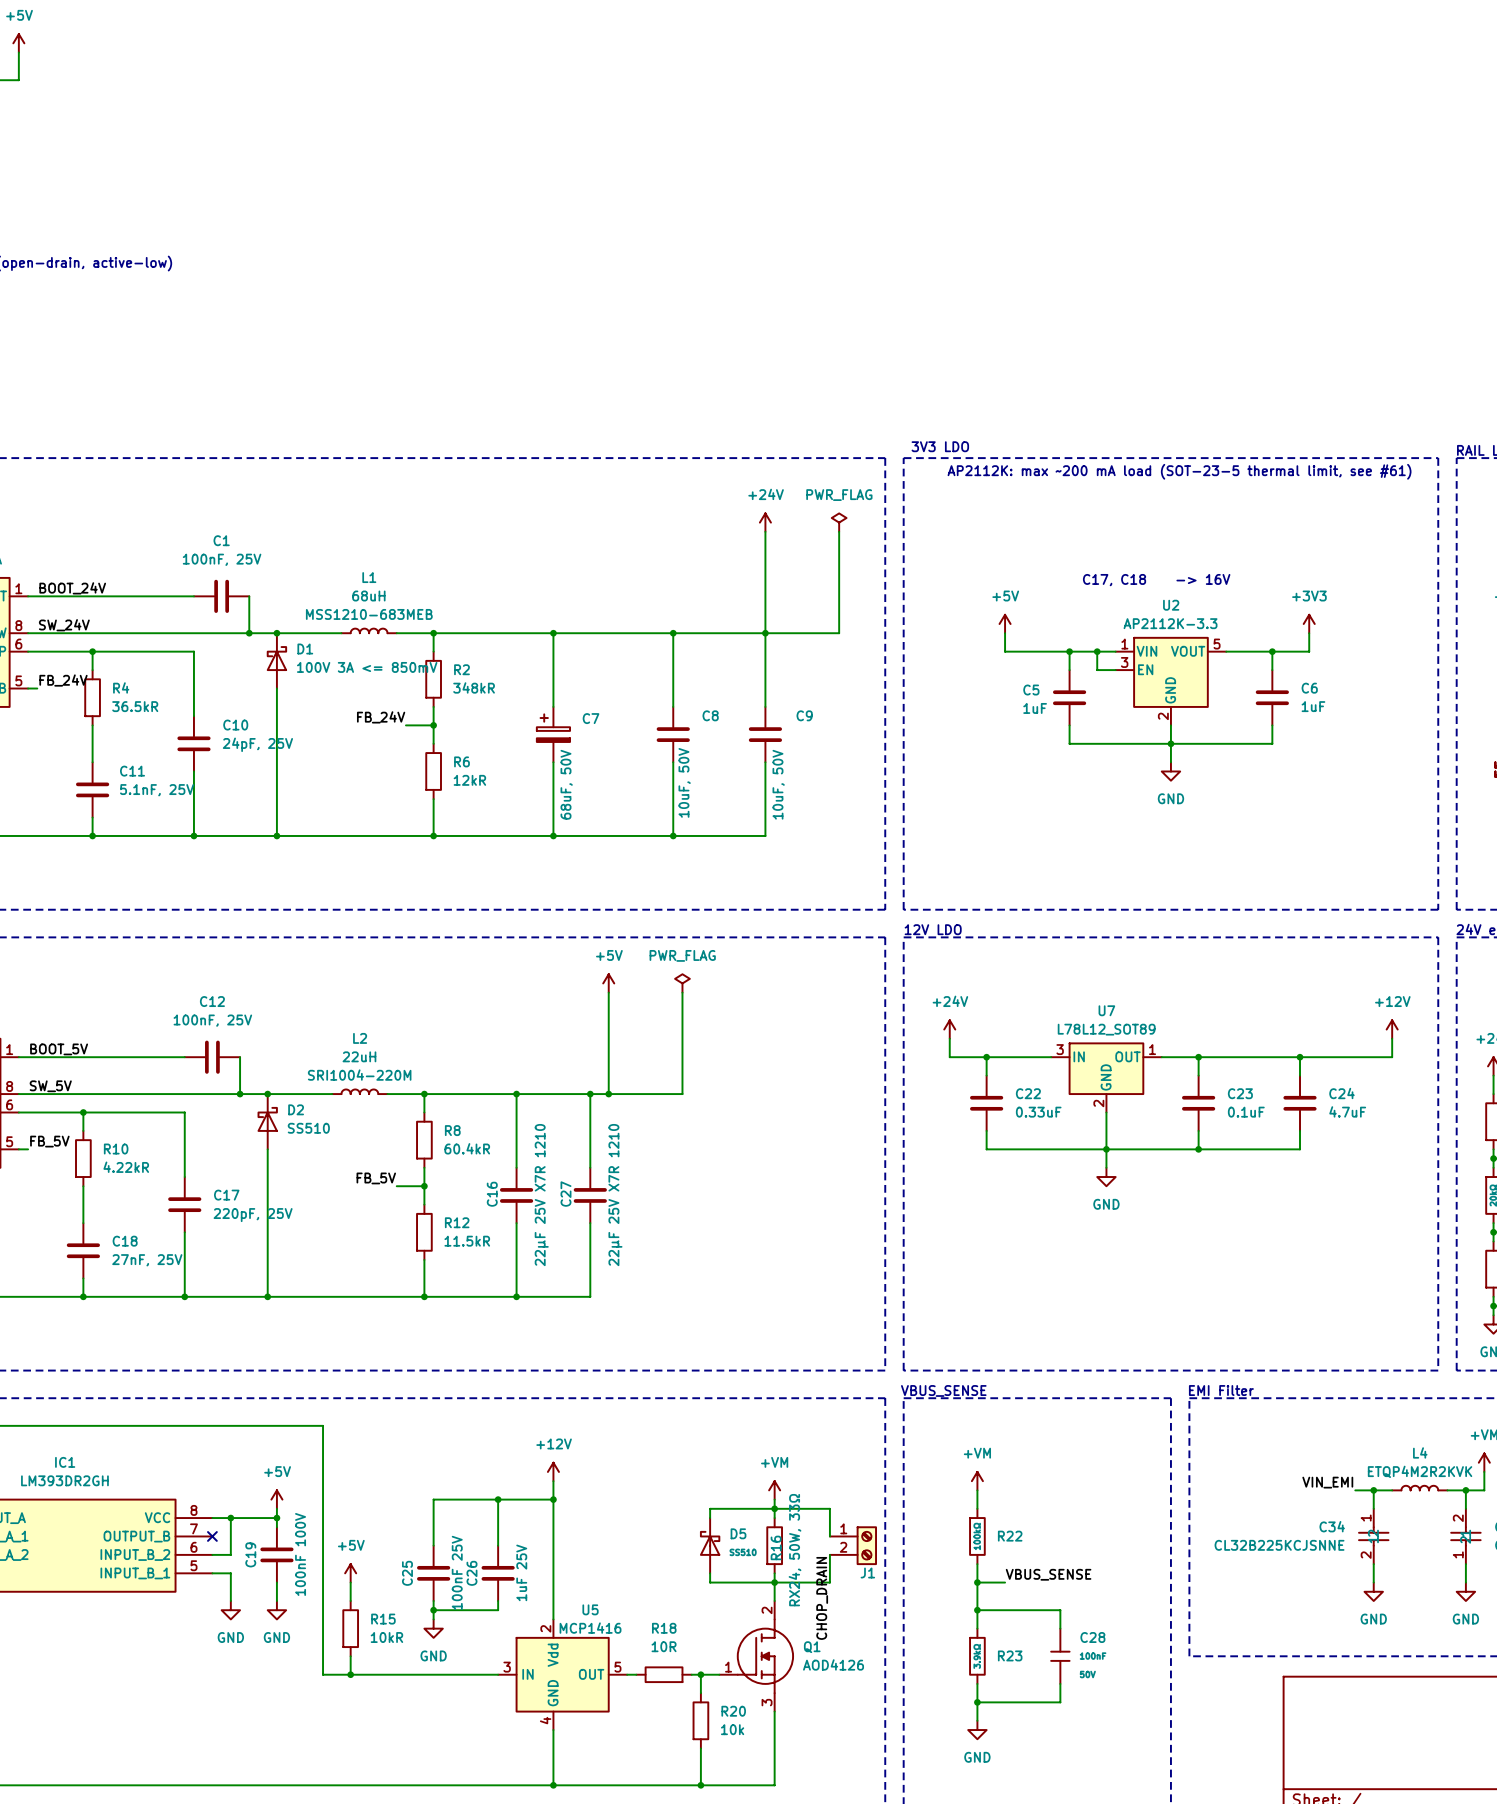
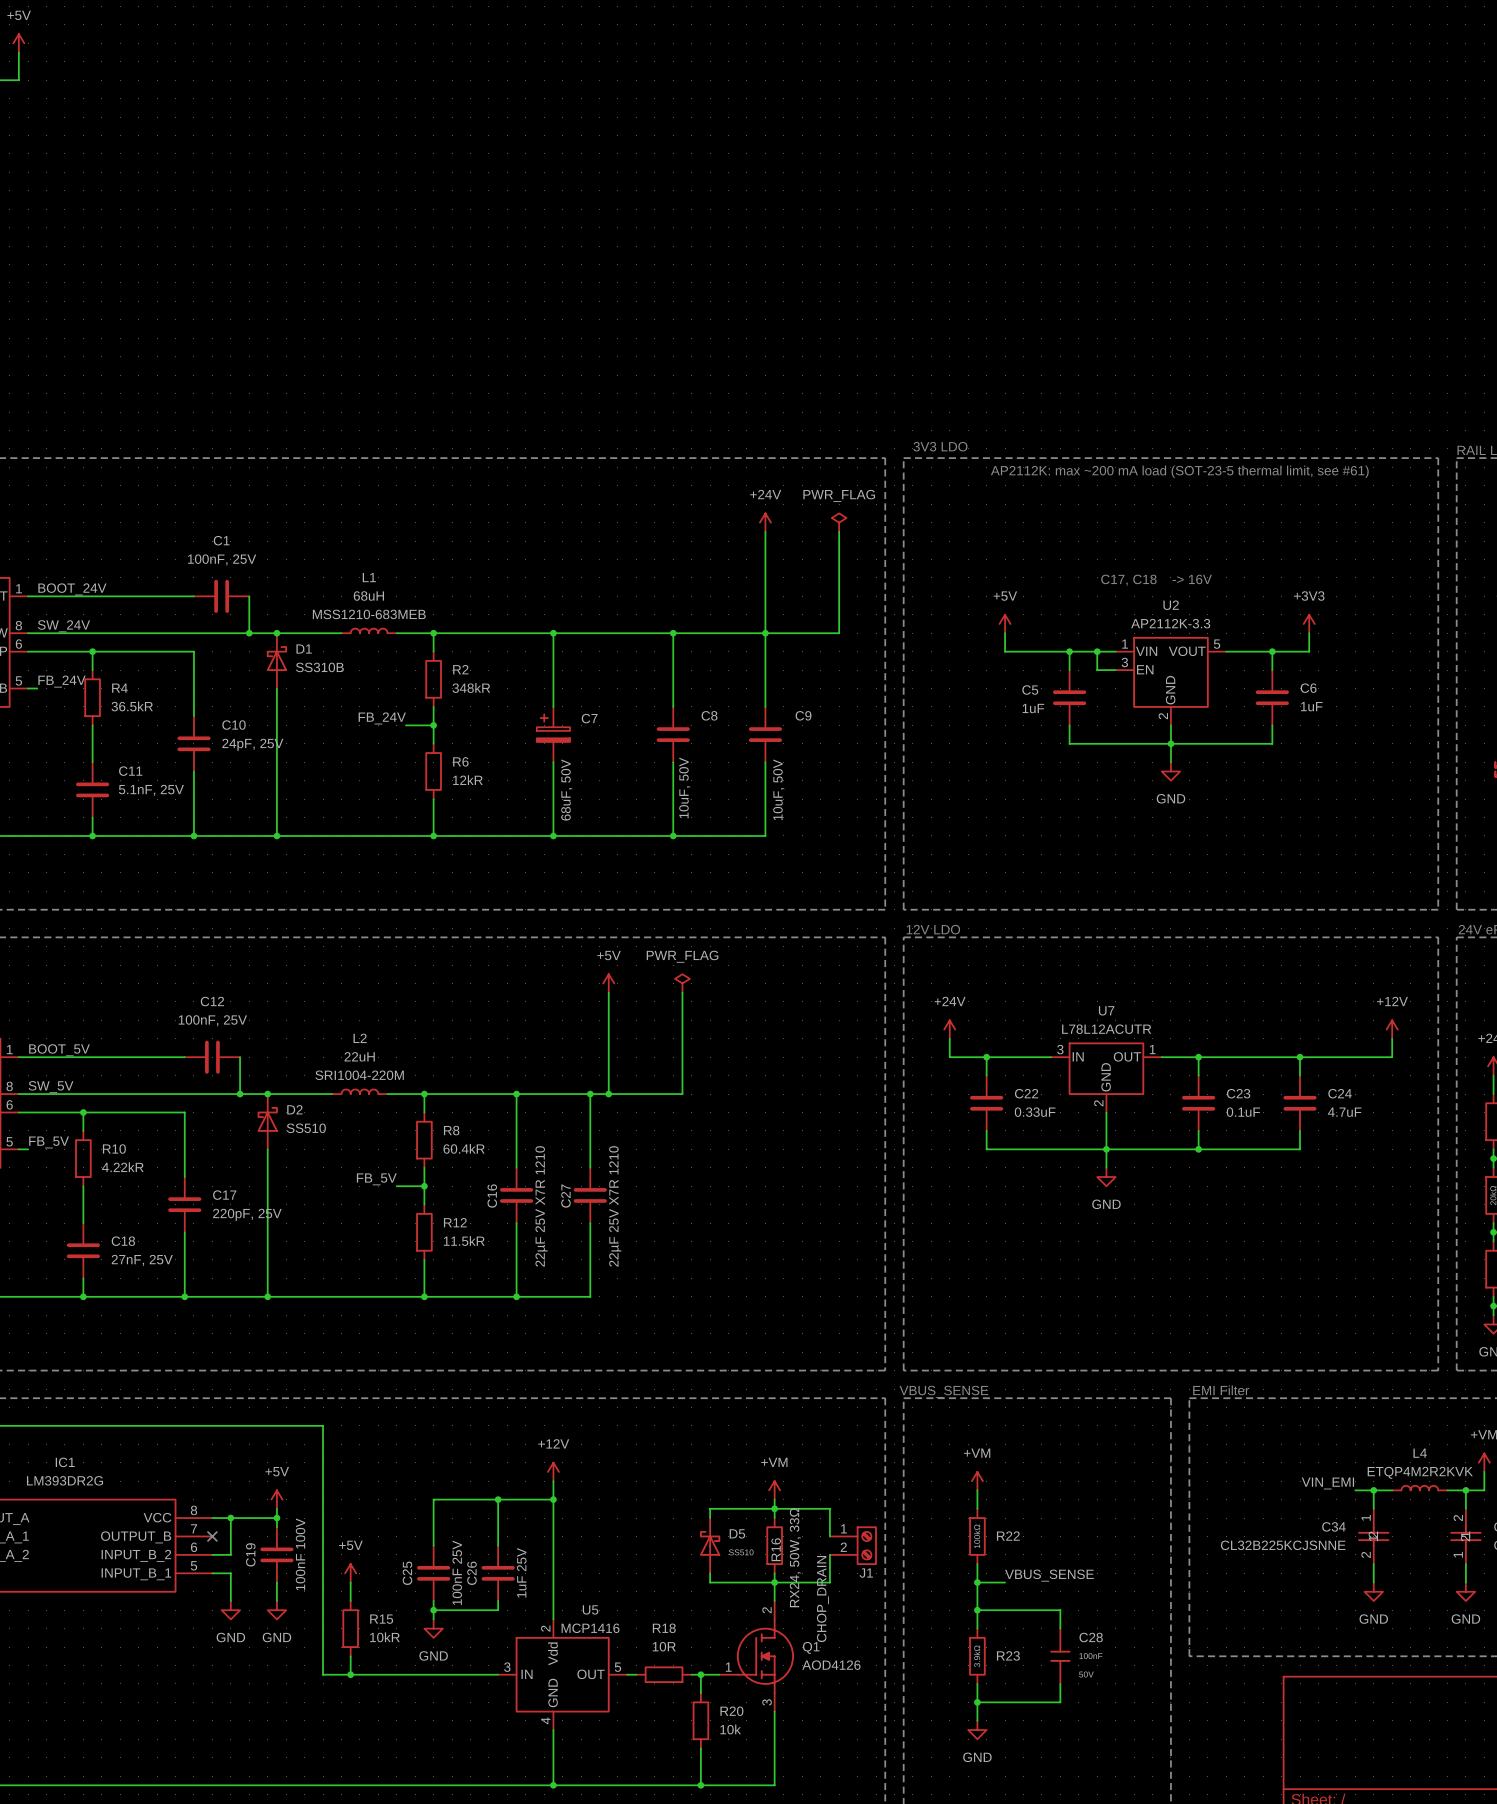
D1 value: 100V 3A <= 850mV (367, 667) -> SS310B (319, 667)
U7 value: L78L12_SOT89 (1106, 1029) -> L78L12ACUTR (1106, 1029)
IC1 value: LM393DR2GH (64, 1480) -> LM393DR2G (64, 1480)

